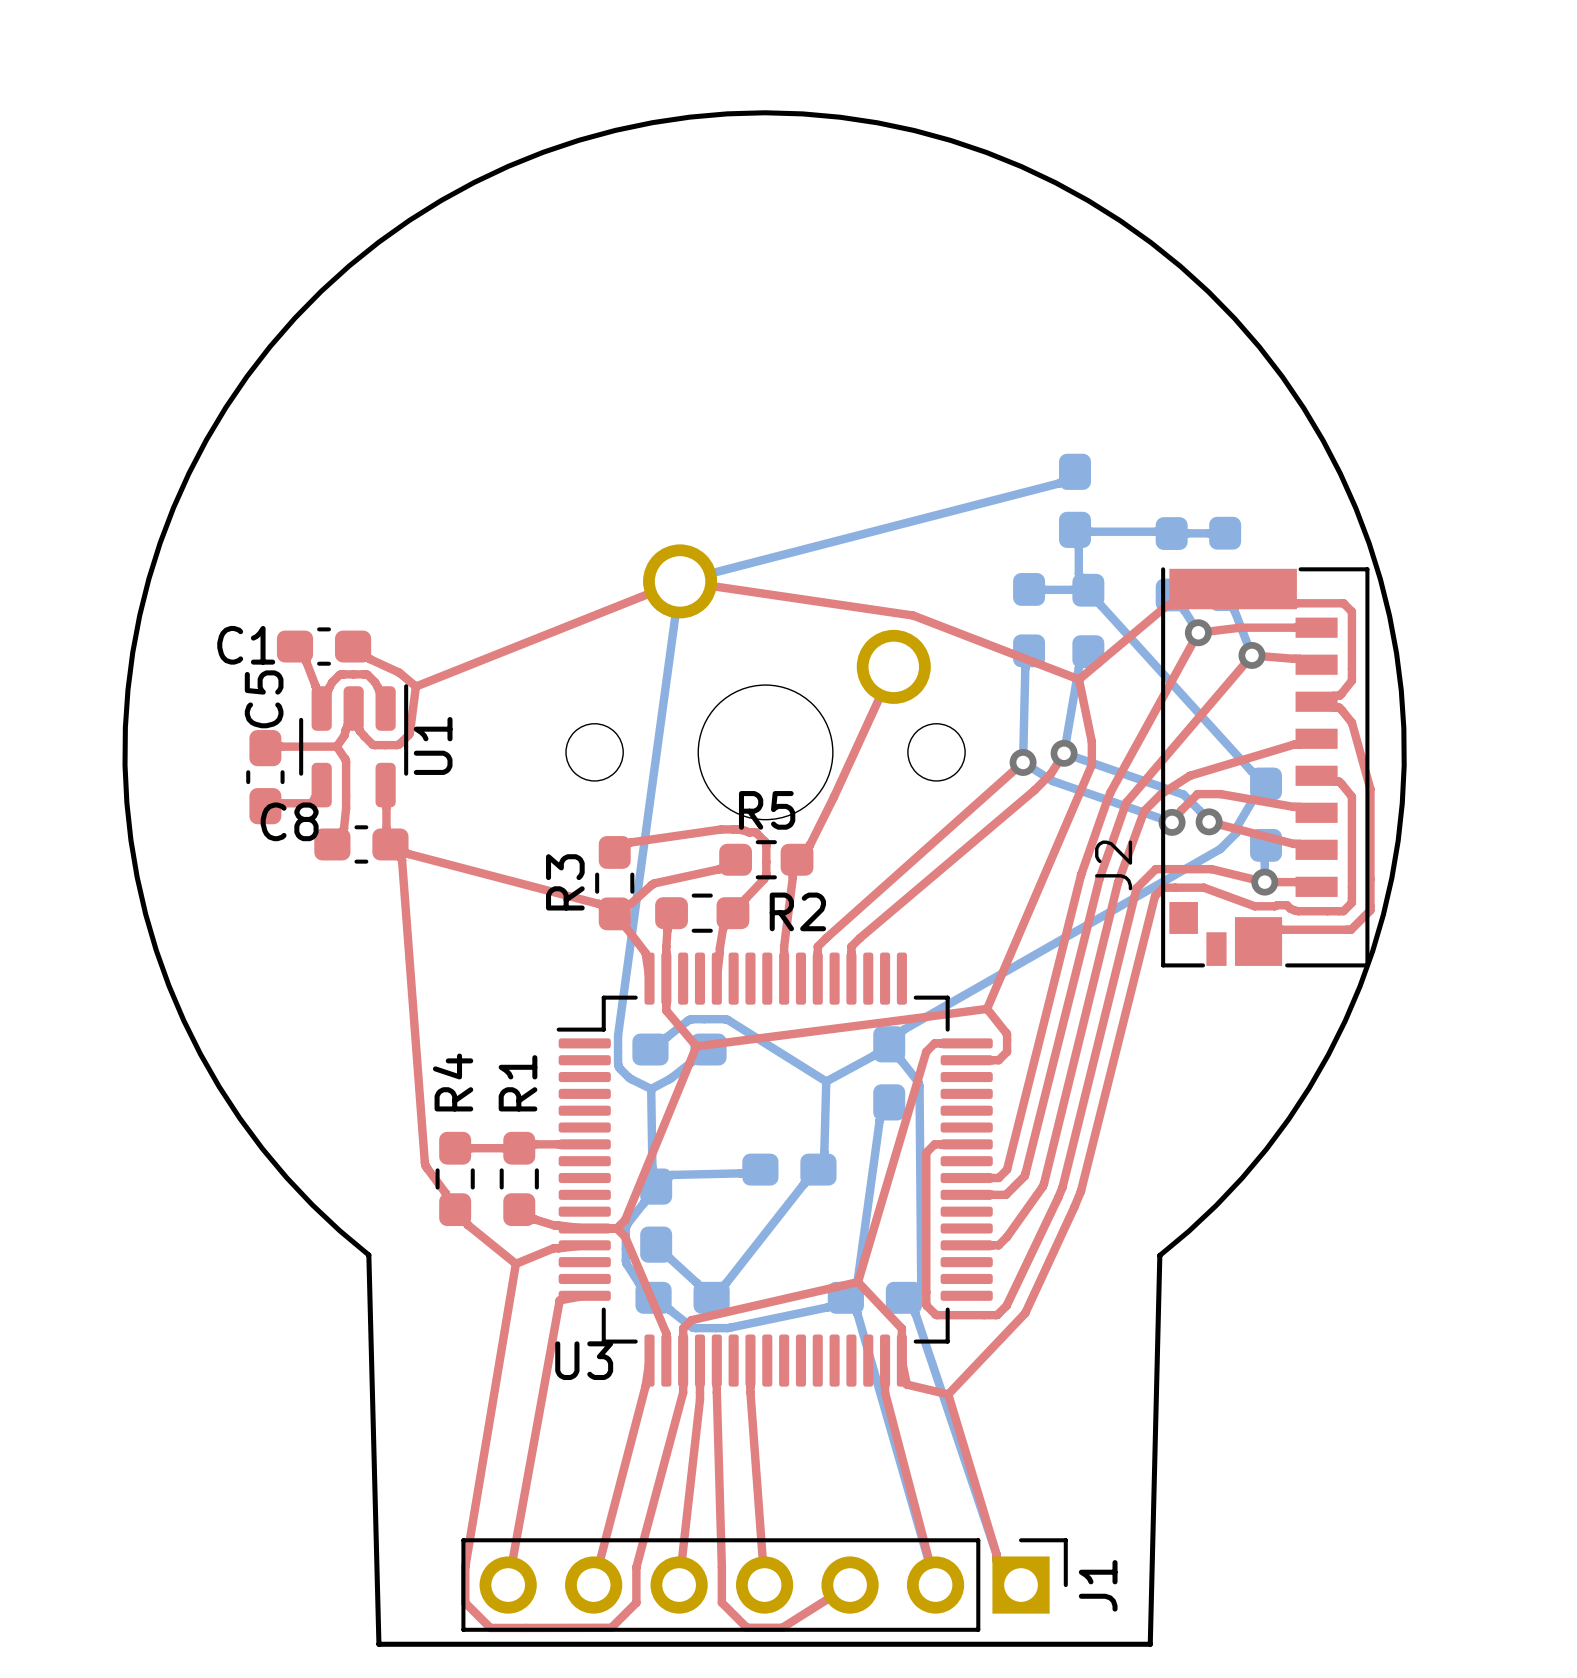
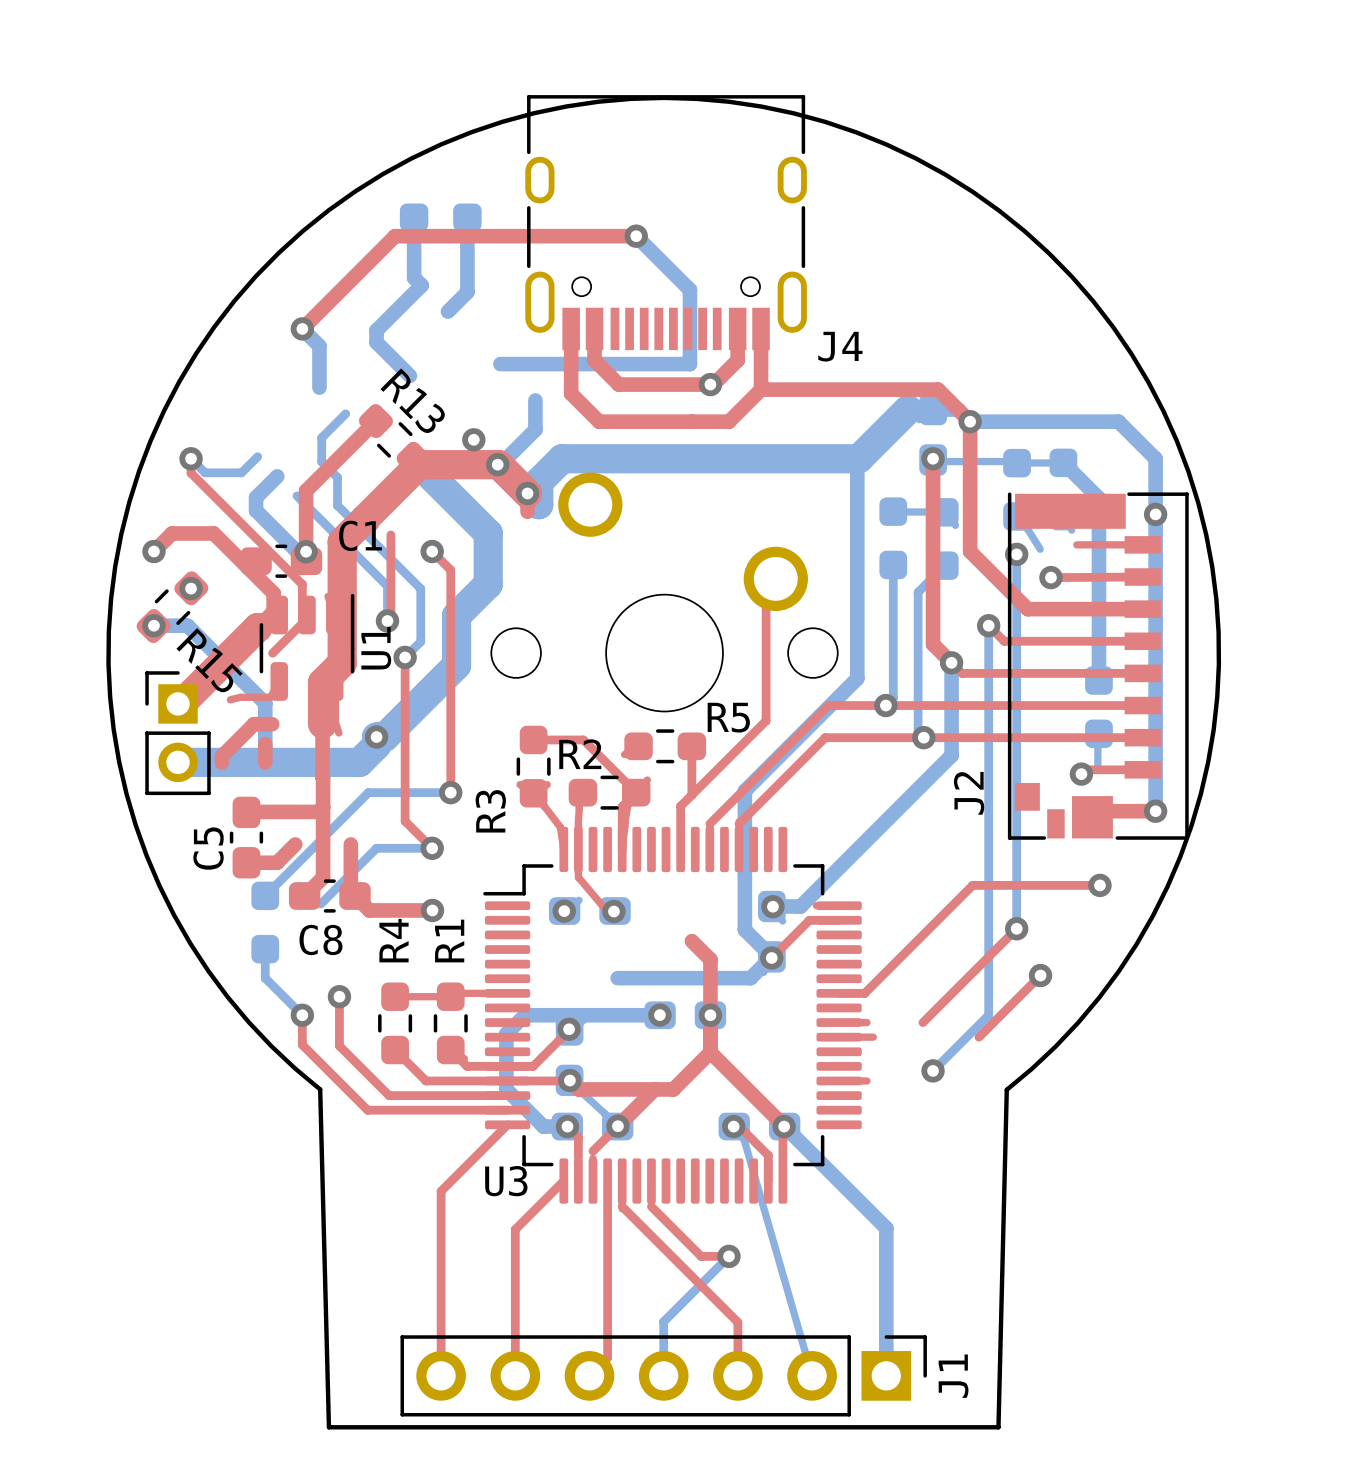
bottom track: none -> (414, 217) (414, 277) (421, 285) (376, 330) (376, 342) (409, 375)
part: none -> (440, 217)
bottom track: none -> (467, 217) (467, 292) (447, 311)
J4: none -> (666, 222)
top track: none -> (636, 236) (395, 236) (302, 328)
bottom track: none -> (636, 236) (689, 289) (689, 364) (500, 364)
via: none -> (636, 236)
bottom track: none -> (302, 328) (319, 346) (319, 387)
via: none -> (302, 328)
top track: none -> (571, 328) (571, 393) (599, 421) (728, 421) (761, 389)
top track: none -> (594, 328) (594, 360) (618, 384) (713, 384) (737, 360) (737, 328)
top track: none -> (761, 328) (761, 389)
via: none -> (710, 384)
top track: none -> (761, 389) (938, 389) (970, 421) (970, 551) (1027, 609) (1142, 609)
bottom track: none -> (535, 400) (535, 429) (499, 465)
bottom track: none -> (908, 409) (958, 409) (970, 421) (1118, 421) (1155, 458) (1155, 811)
bottom track: none -> (908, 409) (857, 460) (857, 678) (744, 791) (744, 929) (771, 956) (750, 978) (617, 978)
bottom track: none -> (908, 409) (858, 458) (562, 458) (538, 482) (538, 504) (497, 464)
bottom track: none -> (345, 413) (321, 437) (321, 461) (337, 477) (337, 505) (420, 588) (420, 641) (405, 657)
bottom track: (1058, 483) (680, 581) (618, 1035) (618, 1066) (628, 1077) (651, 1088) -> none
top track: none -> (375, 421) (306, 490) (306, 551)
via: none -> (970, 421)
R13: none -> (394, 439)
via: none -> (473, 439)
bottom track: none -> (257, 456) (241, 472) (205, 472) (191, 458)
top track: none -> (191, 458) (191, 473) (302, 584) (302, 623) (272, 653)
via: none -> (191, 458)
via: none -> (933, 458)
bottom track: none -> (1063, 462) (1098, 498) (1098, 680)
via: none -> (497, 464)
bottom track: none -> (413, 467) (422, 467) (488, 533) (488, 584) (456, 615) (456, 665) (384, 737) (376, 737) (376, 745) (359, 762) (178, 762)
bottom track: none -> (277, 476) (256, 497) (256, 510) (297, 551) (306, 551)
via: none -> (527, 493)
bottom track: none -> (296, 495) (338, 537)
top track: none -> (527, 511) (527, 493) (498, 464) (419, 464) (342, 541) (342, 662) (322, 682) (323, 877) (304, 895)
via: none -> (1155, 514)
bottom track: (1100, 605) (1250, 770) (1266, 783) (1253, 798) -> none
bottom track: (1234, 611) (1251, 655) -> none
top track: none -> (390, 534) (390, 617) (387, 620)
bottom track: none -> (339, 537) (387, 586) (387, 620)
top track: (1240, 627) (1198, 632) (1110, 792) (1081, 874) -> none
via: (1198, 632) -> none
top track: none -> (153, 551) (172, 533) (213, 533) (273, 593) (273, 611) (181, 703) (178, 703)
via: none -> (153, 551)
via: none -> (306, 551)
top track: none -> (432, 551) (450, 570) (450, 792)
via: none -> (432, 551)
bottom track: none -> (1016, 554) (1016, 928)
via: none -> (1016, 554)
C1 name position: C1 (246, 645) -> C1 (360, 535)
bottom track: (1029, 650) (1025, 663) (1023, 762) (1052, 781) (1172, 822) -> (893, 564) (893, 698) (885, 705)
bottom track: (1088, 651) (1078, 667) (1064, 753) (1183, 794) (1209, 821) -> (944, 565) (918, 592) (918, 731) (923, 737)
via: (1251, 655) -> none
top track: (369, 659) (398, 672) (415, 686) -> none
top track: (306, 662) (315, 686) -> none
top track: (1316, 664) (1299, 658) (1251, 655) (1126, 802) (1099, 878) (1024, 1176) (1006, 1194) -> (1142, 577) (1051, 577)
via: none -> (1050, 577)
top track: (893, 666) (810, 844) -> (776, 578) (766, 588) (766, 720) (680, 806) (680, 826)
via: none -> (191, 588)
top track: (1078, 679) (1167, 604) (1233, 589) (1292, 603) (1343, 603) (1351, 611) (1351, 680) (1339, 695) (1316, 701) (1339, 707) (1351, 722) (1370, 789) (1370, 910) (1351, 929) (1277, 929) (1258, 941) -> (1155, 811) (1098, 811) (1092, 817)
top track: (1078, 679) (913, 615) (680, 581) (415, 686) -> none
top track: (1078, 679) (1091, 741) (1091, 764) (987, 1008) -> none
top track: (315, 686) (321, 708) (329, 687) (339, 674) (367, 674) (377, 686) -> none
top track: (415, 686) (409, 733) (400, 743) (372, 744) (359, 730) -> none
R15: none -> (172, 607)
C5 name position: C5 (264, 699) -> C5 (208, 848)
via: none -> (387, 620)
bottom track: none -> (153, 625) (187, 625) (265, 703) (265, 762)
via: none -> (153, 625)
bottom track: none -> (988, 625) (988, 1015) (933, 1070)
via: none -> (988, 625)
top track: (345, 730) (344, 735) (336, 746) -> none
top track: (1316, 738) (1189, 776) (1160, 794) (1144, 810) (1118, 882) (1044, 1183) (1007, 1236) (998, 1245) -> (1142, 641) (1004, 641) (988, 625)
top track: (336, 746) (346, 761) (344, 828) -> none
top track: (336, 746) (265, 748) -> none
top track: (1064, 753) (1050, 773) (1034, 790) (851, 946) -> none
via position: (1064, 753) -> (951, 662)
top track: none -> (405, 657) (405, 821) (432, 848)
via: none -> (405, 657)
top track: (1023, 762) (826, 938) (817, 946) (817, 952) -> none
via: (1023, 762) -> none
bottom track: none -> (951, 662) (951, 755) (800, 906) (771, 906)
top track: (1316, 775) (1339, 781) (1351, 796) (1351, 902) (1343, 911) (1298, 911) (1287, 905) (1254, 906) (1203, 887) (1163, 887) (1155, 896) (1081, 1190) -> (1142, 673) (962, 673) (933, 644) (933, 458)
C5 position: (265, 777) -> (246, 837)
bottom track: (1253, 799) (1237, 826) (1236, 833) (1220, 849) (903, 1029) (873, 1055) (826, 1081) -> none
R5 name position: R5 (767, 810) -> R5 (728, 717)
via: none -> (885, 705)
top track: (1316, 812) (1299, 806) (1220, 794) (1197, 794) (1172, 822) -> (1142, 705) (828, 705) (709, 823)
C8 name position: C8 (289, 821) -> C8 (320, 939)
top track: (1209, 821) (1316, 849) -> (739, 823) (825, 737) (1142, 737)
via: (1209, 821) -> none
via: (1172, 822) -> none
top track: none -> (272, 724) (254, 724) (222, 756) (222, 762)
part: none -> (178, 733)
C8 position: (361, 844) -> (329, 895)
top track: (809, 845) (797, 859) (792, 871) (784, 952) -> none
via: none -> (376, 737)
via: none -> (923, 737)
top track: (614, 852) (630, 842) (721, 829) (755, 832) (765, 842) (766, 873) (764, 879) (745, 898) -> (533, 739) (583, 739) (636, 792) (622, 806) (622, 849)
top track: (408, 854) (598, 903) -> none
top track: none -> (265, 743) (265, 762)
top track: none -> (691, 746) (691, 795)
top track: (402, 860) (424, 1162) (445, 1193) -> none
J2 name position: J2 (1113, 865) -> J2 (969, 793)
top track: (719, 869) (654, 883) (630, 903) -> none
top track: (1081, 875) (1007, 1169) (998, 1178) -> none
R3 name position: R3 (565, 882) -> R3 (490, 811)
via position: (1264, 882) -> (1081, 774)
top track: (1316, 886) (1299, 882) (1264, 882) (1211, 869) (1155, 869) (1136, 888) (1062, 1187) (1006, 1305) (996, 1315) (937, 1315) (926, 1305) -> (1142, 769) (1085, 769) (1081, 774)
R2 name position: R2 (797, 911) -> R2 (580, 754)
bottom track: none -> (450, 792) (368, 792) (265, 895)
via: none -> (450, 792)
top track: none -> (323, 807) (318, 811) (246, 812)
via: none -> (1155, 811)
top track: none -> (295, 844) (277, 862) (246, 862)
top track: none -> (350, 844) (350, 891) (369, 910) (432, 910)
bottom track: none -> (432, 848) (376, 848) (320, 903)
via: none -> (432, 848)
top track: (987, 1008) (1006, 1033) (1007, 1051) (998, 1060) (966, 1060) -> (771, 957) (809, 920) (839, 920)
top track: (987, 1008) (696, 1046) (625, 1220) (616, 1228) (610, 1228) (616, 1228) (625, 1236) (666, 1333) -> (567, 1126) (578, 1137) (578, 1157)
via: none -> (1099, 885)
bottom track: (667, 1036) (689, 1019) (727, 1019) (826, 1081) -> none
top track: (940, 1043) (934, 1043) (926, 1051) (857, 1282) -> none
via: none -> (772, 906)
via: none -> (432, 910)
via: none -> (564, 911)
via: none -> (613, 911)
bottom track: (901, 1061) (919, 1086) (921, 1284) (903, 1297) (915, 1313) -> none
part: none -> (265, 922)
bottom track: (691, 1062) (669, 1079) (651, 1088) -> none
top track: none -> (1016, 928) (922, 1022)
via: none -> (1016, 928)
bottom track: (826, 1081) (824, 1157) (818, 1169) (803, 1184) -> none
top track: none -> (691, 941) (710, 959) (710, 1052)
bottom track: (651, 1088) (652, 1172) (656, 1186) -> none
bottom track: none -> (265, 949) (265, 978) (302, 1015)
via: none -> (771, 957)
bottom track: (879, 1120) (857, 1281) -> none
top track: none -> (1040, 975) (978, 1037)
via: none -> (1040, 975)
top track: (966, 1144) (934, 1144) (926, 1152) (926, 1304) -> (839, 993) (864, 993) (972, 885) (1099, 885)
top track: none -> (339, 996) (339, 1045) (389, 1095) (507, 1095)
via: none -> (339, 996)
top track: none -> (302, 1015) (302, 1044) (367, 1110) (507, 1110)
via: none -> (302, 1015)
bottom track: (760, 1169) (746, 1173) (671, 1174) (656, 1186) -> (660, 1015) (524, 1015) (506, 1033) (506, 1089) (543, 1126) (567, 1126)
via: none -> (659, 1015)
via: none -> (710, 1015)
bottom track: (803, 1184) (726, 1283) -> none
top track: none -> (569, 1029) (533, 1066) (467, 1066) (450, 1050)
via: none -> (569, 1029)
top track: (1080, 1191) (1025, 1312) (948, 1394) -> none
top track: (445, 1193) (467, 1224) (515, 1263) -> none
bottom track: (643, 1203) (625, 1228) (626, 1263) (638, 1283) -> none
top track: none -> (395, 1050) (426, 1080) (569, 1080) (578, 1089) (673, 1089) (710, 1052)
top track: none -> (710, 1052) (784, 1126)
top track: (535, 1219) (554, 1225) (584, 1228) -> none
via: none -> (933, 1070)
via: none -> (569, 1080)
top track: (584, 1245) (553, 1248) (515, 1263) -> none
top track: none -> (654, 1089) (593, 1151)
top track: (515, 1263) (465, 1567) (465, 1602) (490, 1627) (611, 1627) (636, 1602) (636, 1567) (683, 1392) (683, 1360) -> none
top track: (857, 1282) (901, 1328) (901, 1334) -> (784, 1126) (782, 1158)
top track: (857, 1282) (691, 1320) (683, 1328) (683, 1334) -> none
top track: (584, 1295) (559, 1300) (508, 1585) -> (507, 1124) (441, 1191) (441, 1375)
via: none -> (567, 1126)
via: none -> (617, 1126)
via: none -> (733, 1126)
via: none -> (784, 1126)
bottom track: (827, 1307) (727, 1328) (692, 1327) (670, 1310) -> none
bottom track: (915, 1313) (996, 1554) (996, 1560) (1021, 1585) -> (784, 1126) (886, 1228) (886, 1375)
top track: (649, 1360) (645, 1386) (593, 1585) -> (563, 1181) (515, 1229) (515, 1375)
top track: (885, 1360) (885, 1392) (935, 1585) -> (768, 1181) (768, 1155) (739, 1126) (733, 1126)
top track: (901, 1360) (906, 1384) (948, 1394) -> none
top track: (699, 1386) (679, 1585) -> (607, 1203) (607, 1357) (589, 1375)
top track: (750, 1386) (764, 1585) -> none
top track: none -> (651, 1206) (701, 1256) (728, 1256)
top track: (716, 1392) (721, 1602) (746, 1627) (782, 1627) (850, 1585) -> (622, 1206) (737, 1322) (737, 1375)
top track: (948, 1394) (996, 1554) (996, 1560) (1021, 1585) -> none
bottom track: none -> (728, 1256) (663, 1321) (663, 1375)
via: none -> (728, 1256)

